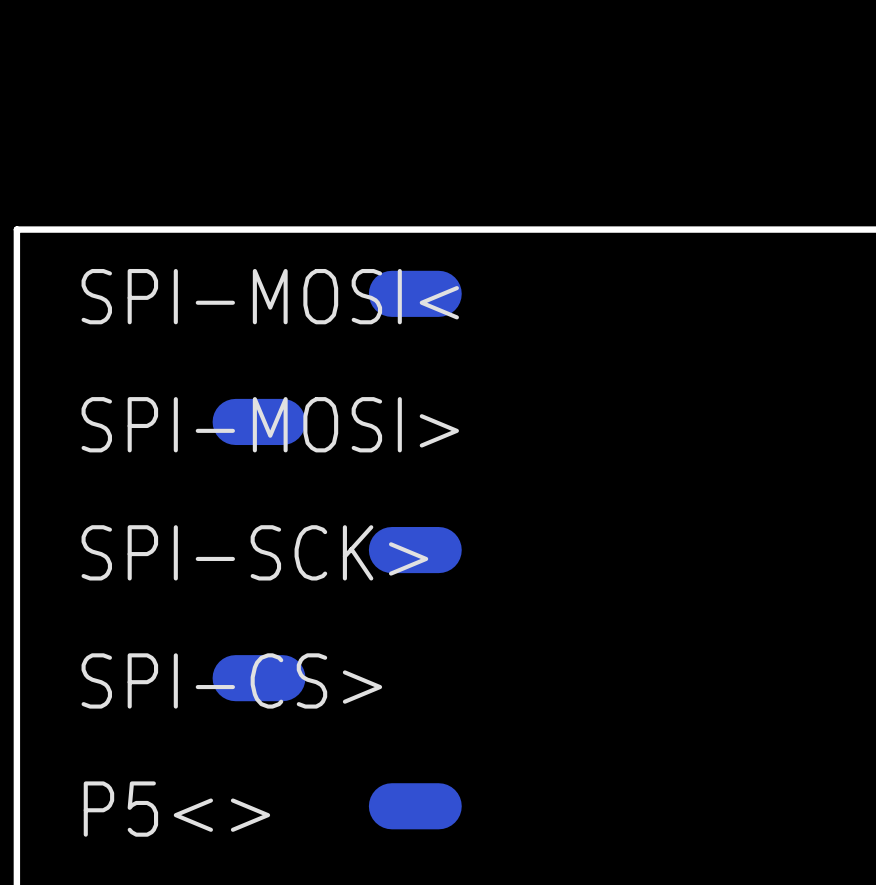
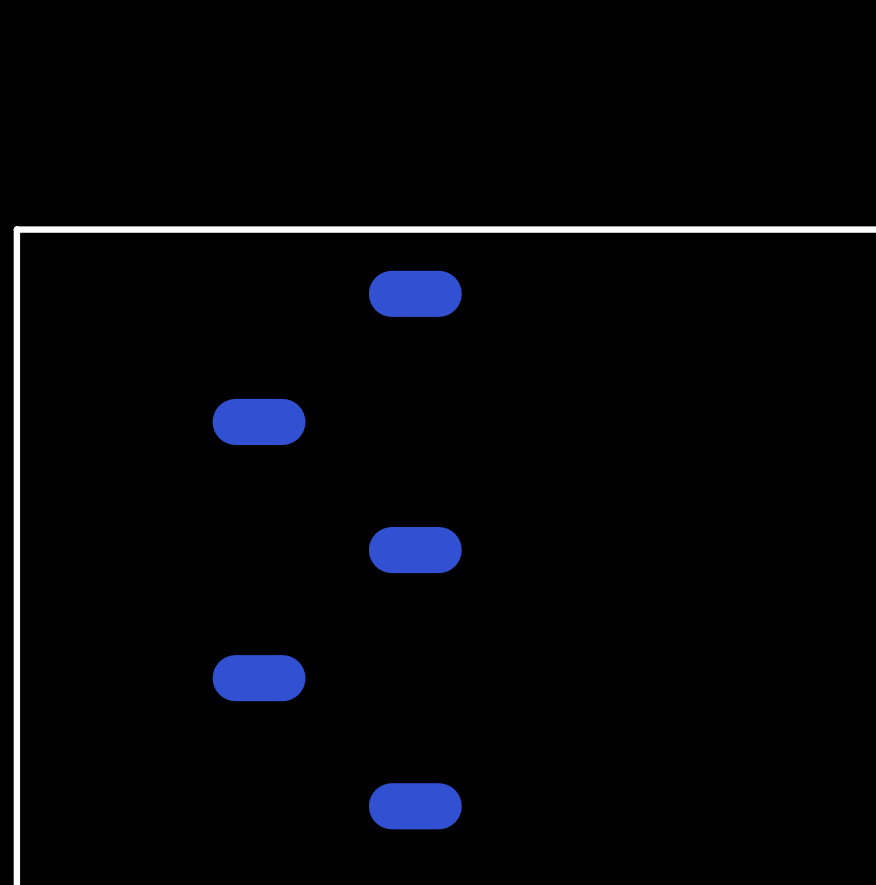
text: SPI-MOSI< (270, 296) -> none
text: SPI-MOSI> (270, 424) -> none
text: SPI-SCK> (254, 552) -> none
text: SPI-CS> (231, 680) -> none
text: P5<> (176, 809) -> none

